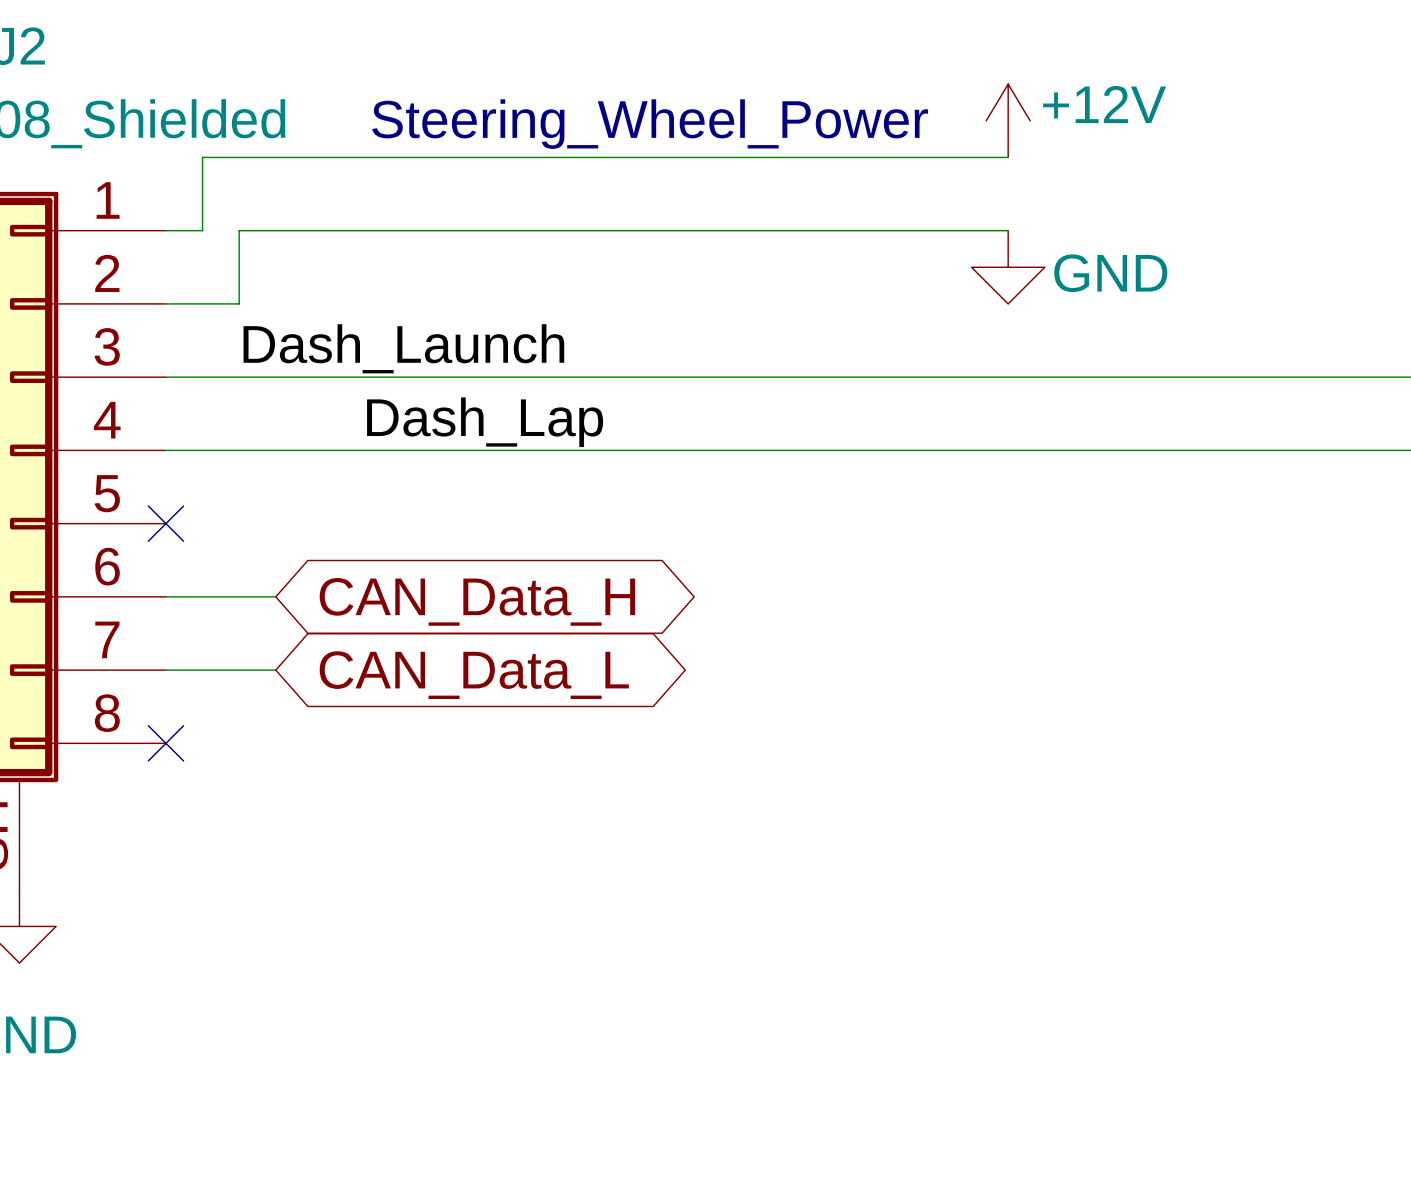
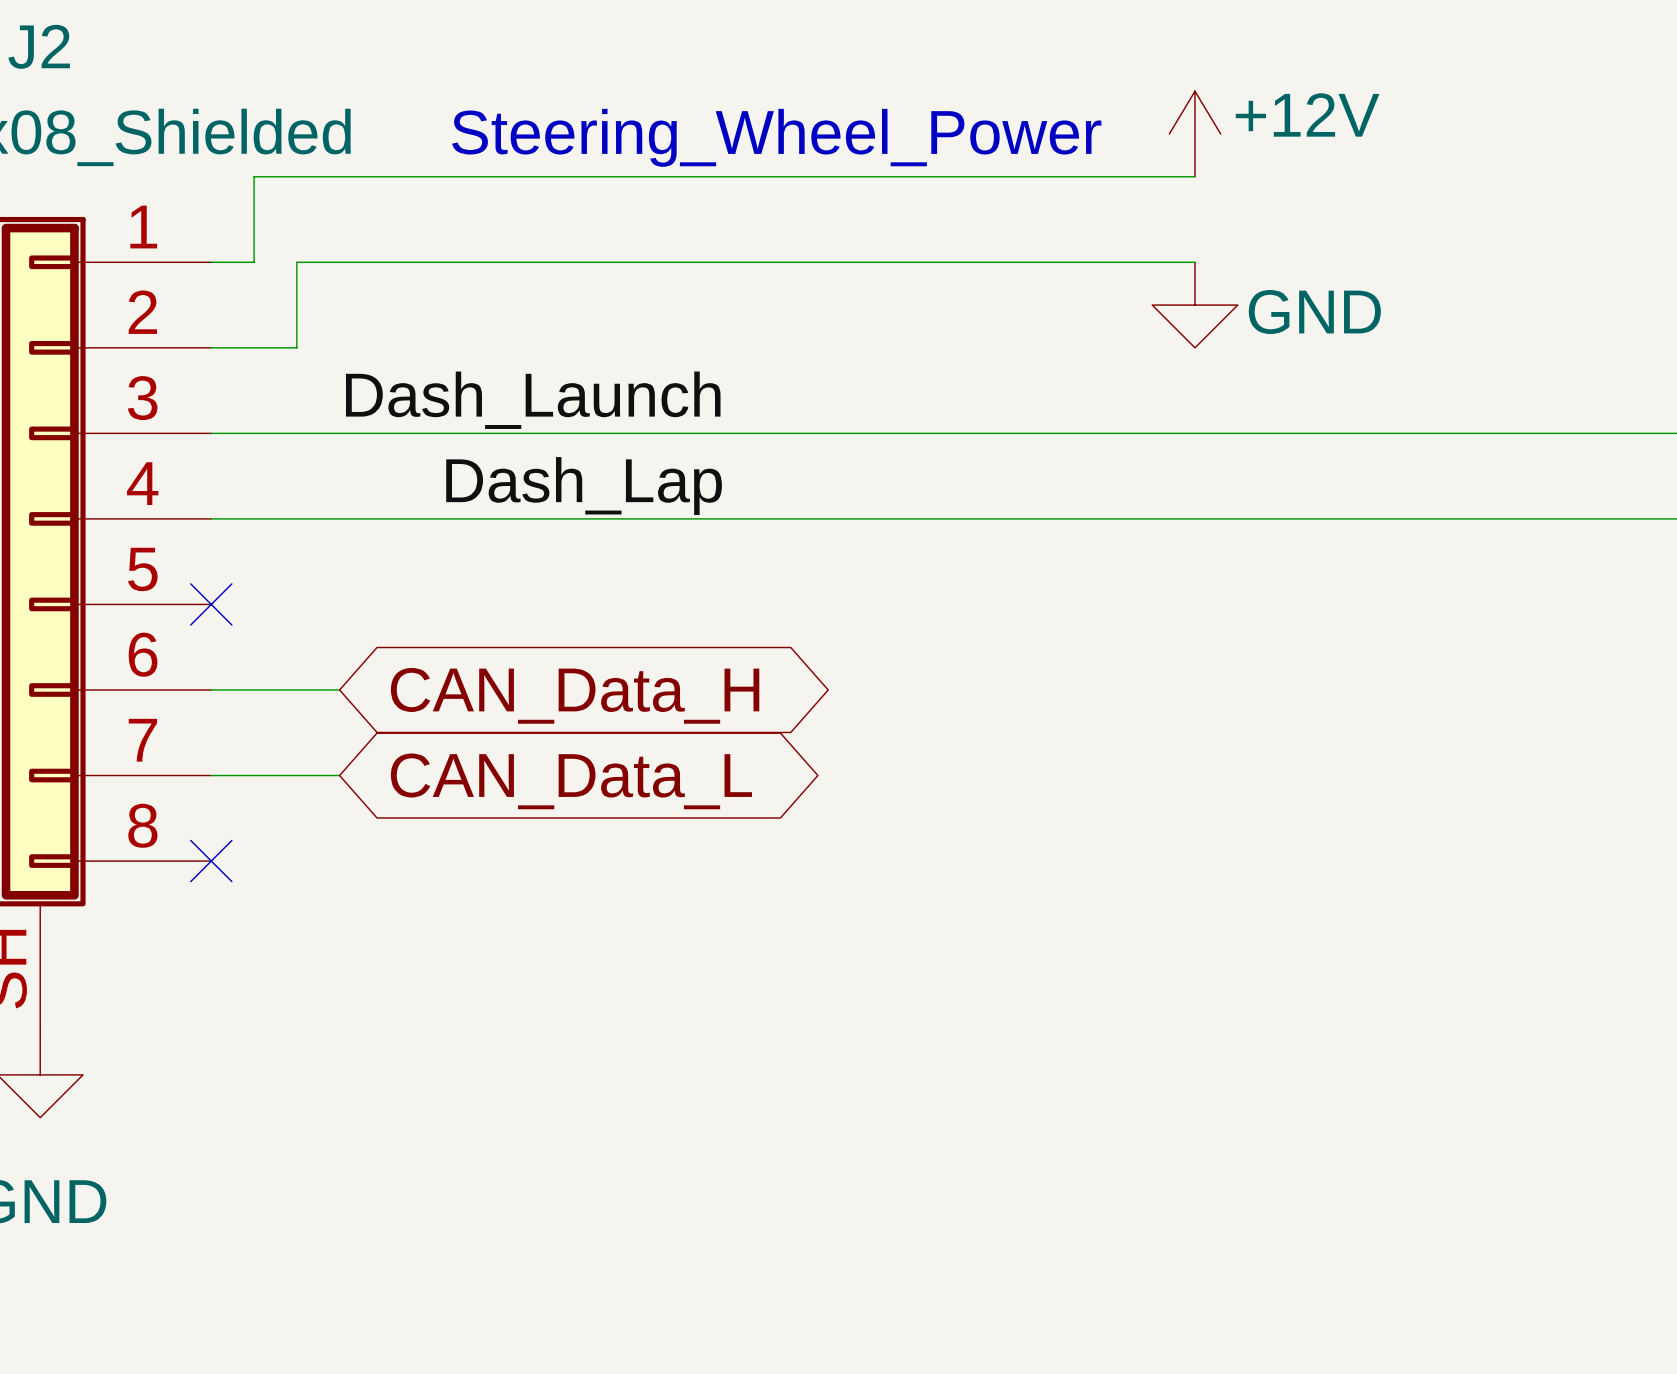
label position: Dash_Launch (403, 348) -> Dash_Launch (533, 400)

